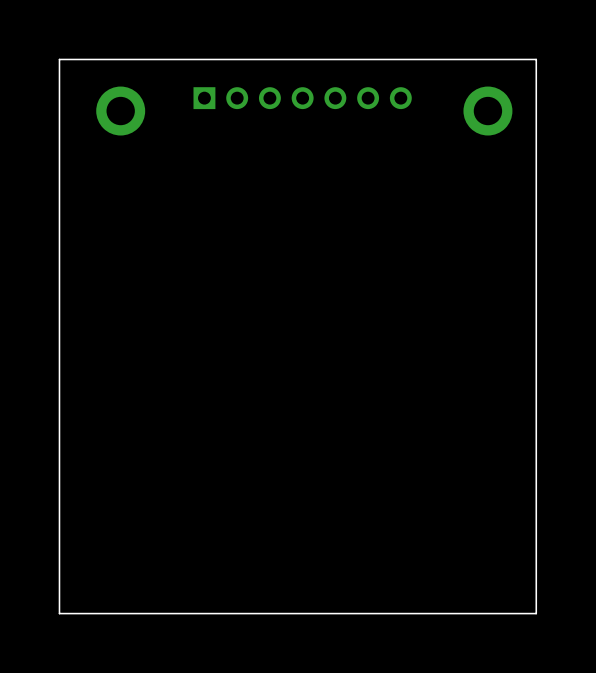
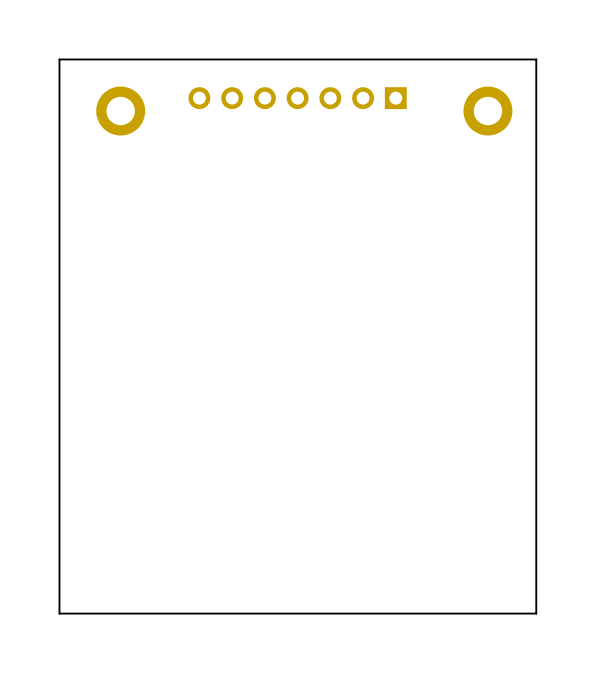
part rotation: 0° (302, 98) -> 180° (297, 98)

